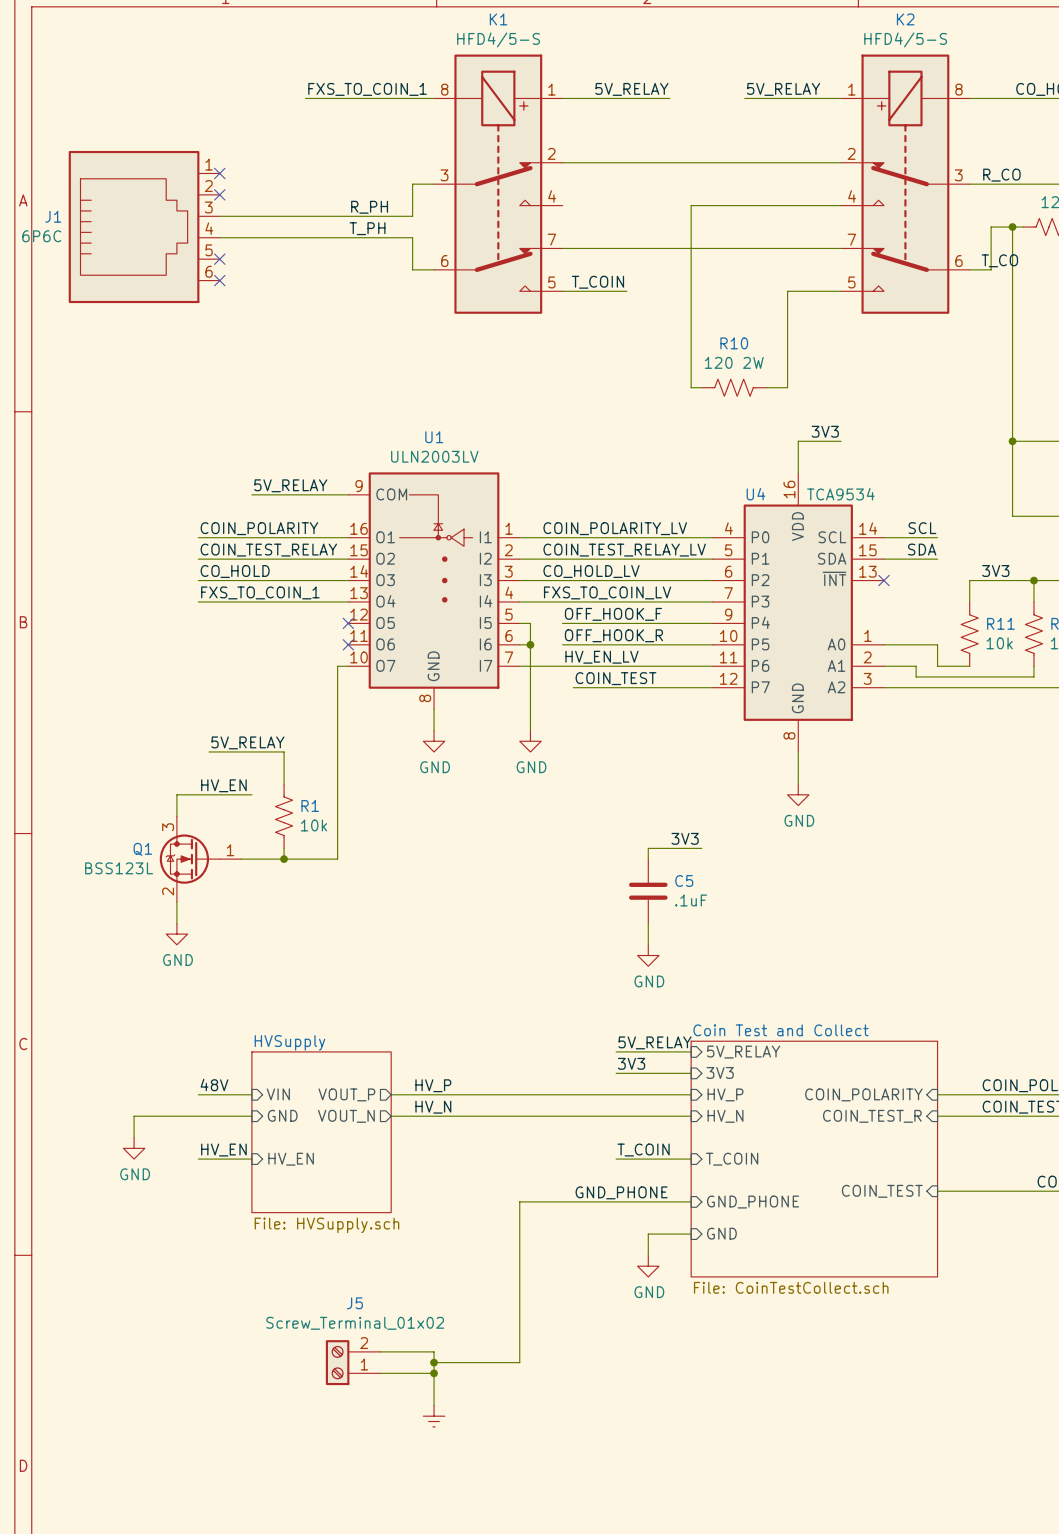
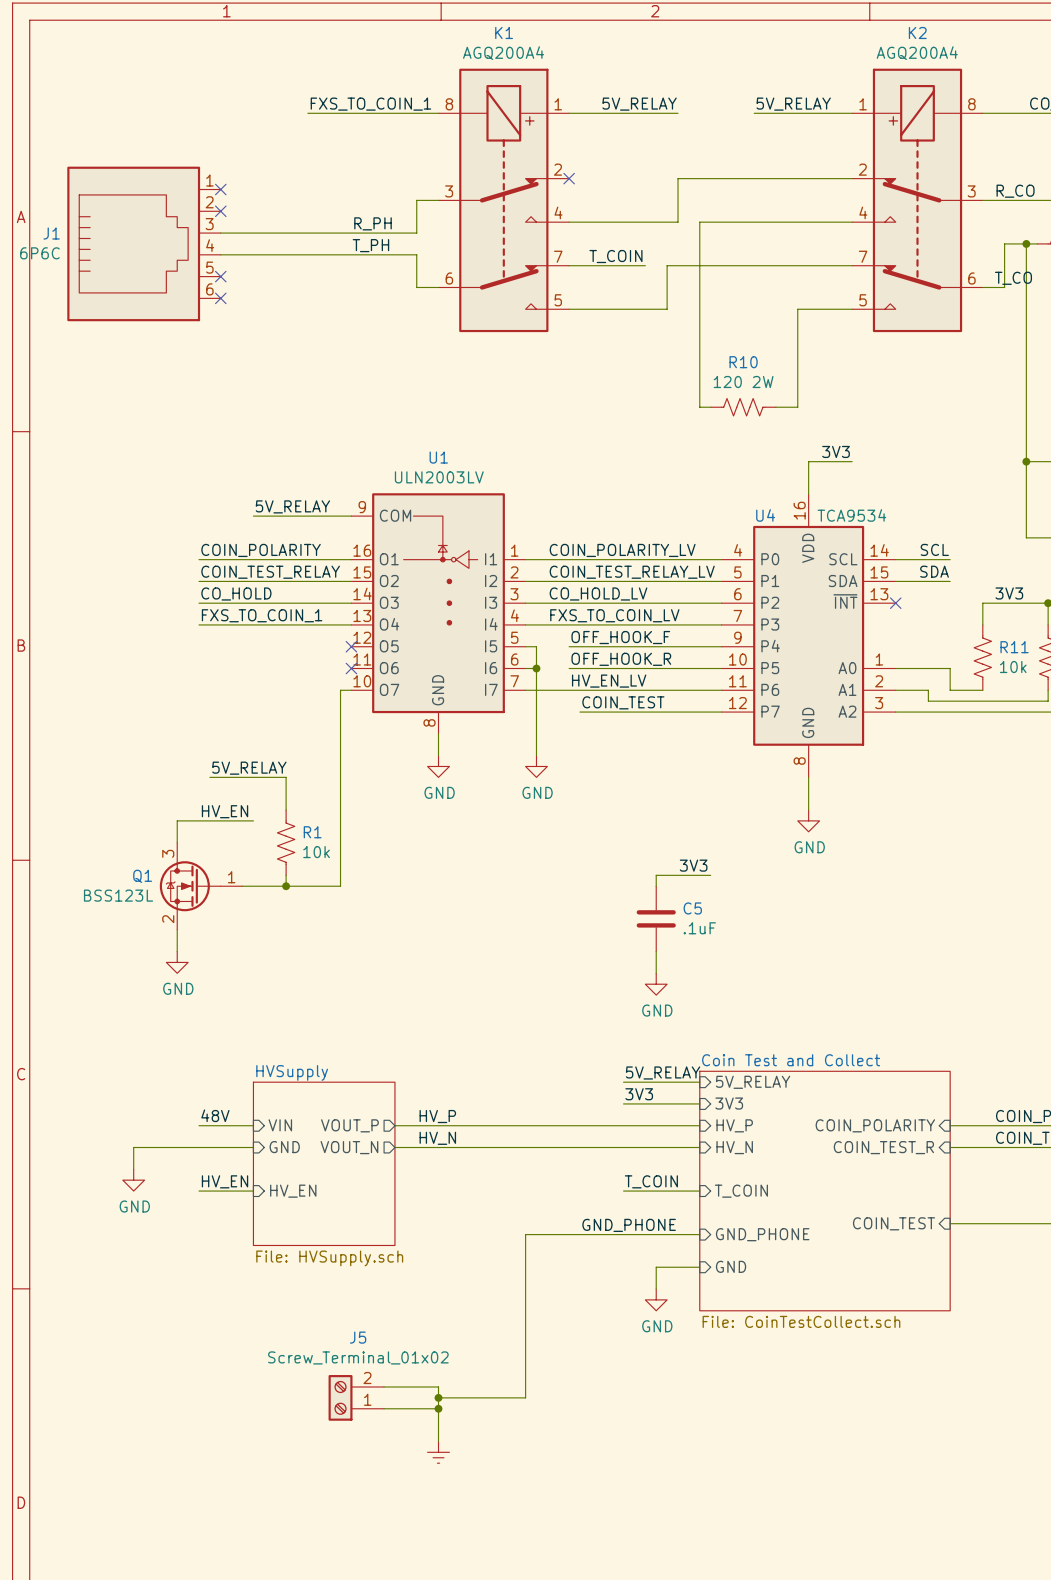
K1 value: HFD4/5-S (498, 39) -> AGQ200A4 (503, 53)
K2 value: HFD4/5-S (905, 39) -> AGQ200A4 (917, 53)
wire: (562, 162) (669, 162) -> (569, 222) (678, 222) (678, 178)
no-connect mark: none -> (569, 178)
wire: (637, 248) (659, 248) -> (634, 309) (667, 309) (667, 265)
label position: T_COIN (597, 282) -> T_COIN (615, 256)

